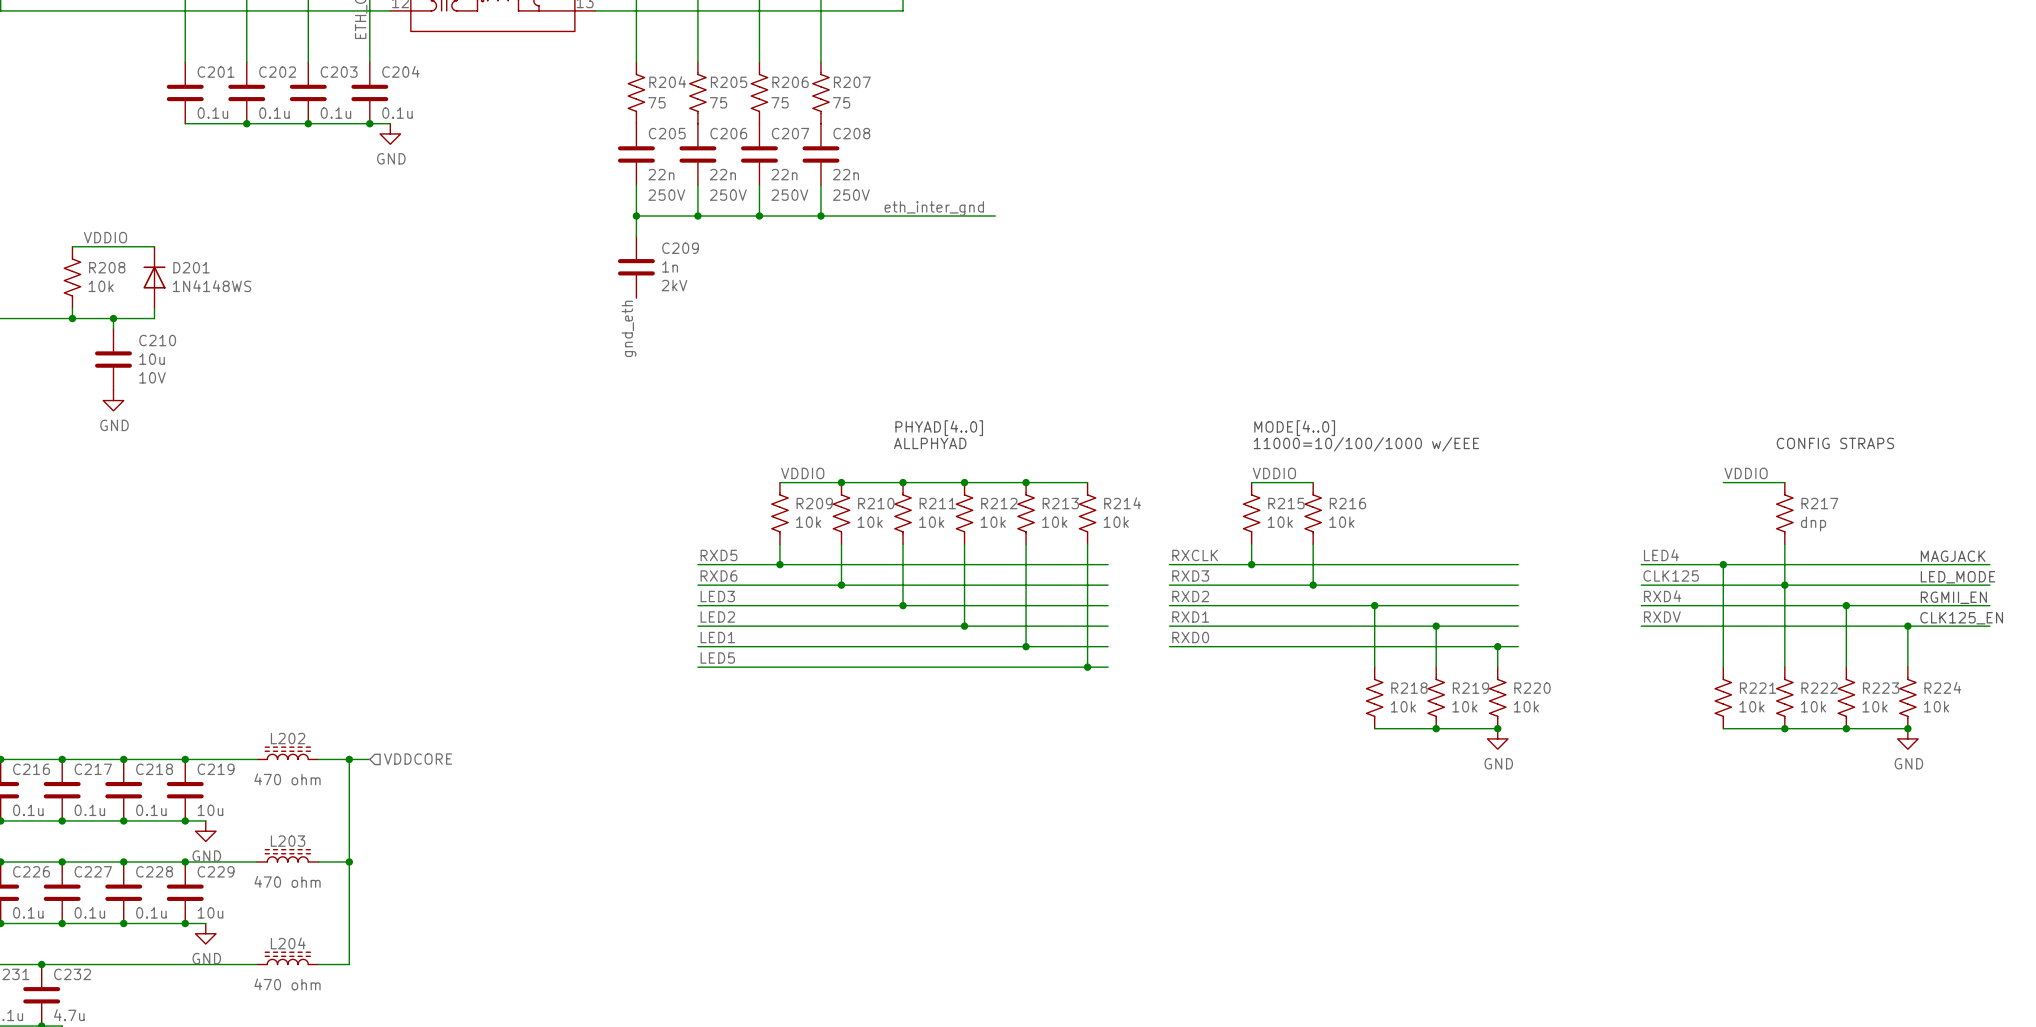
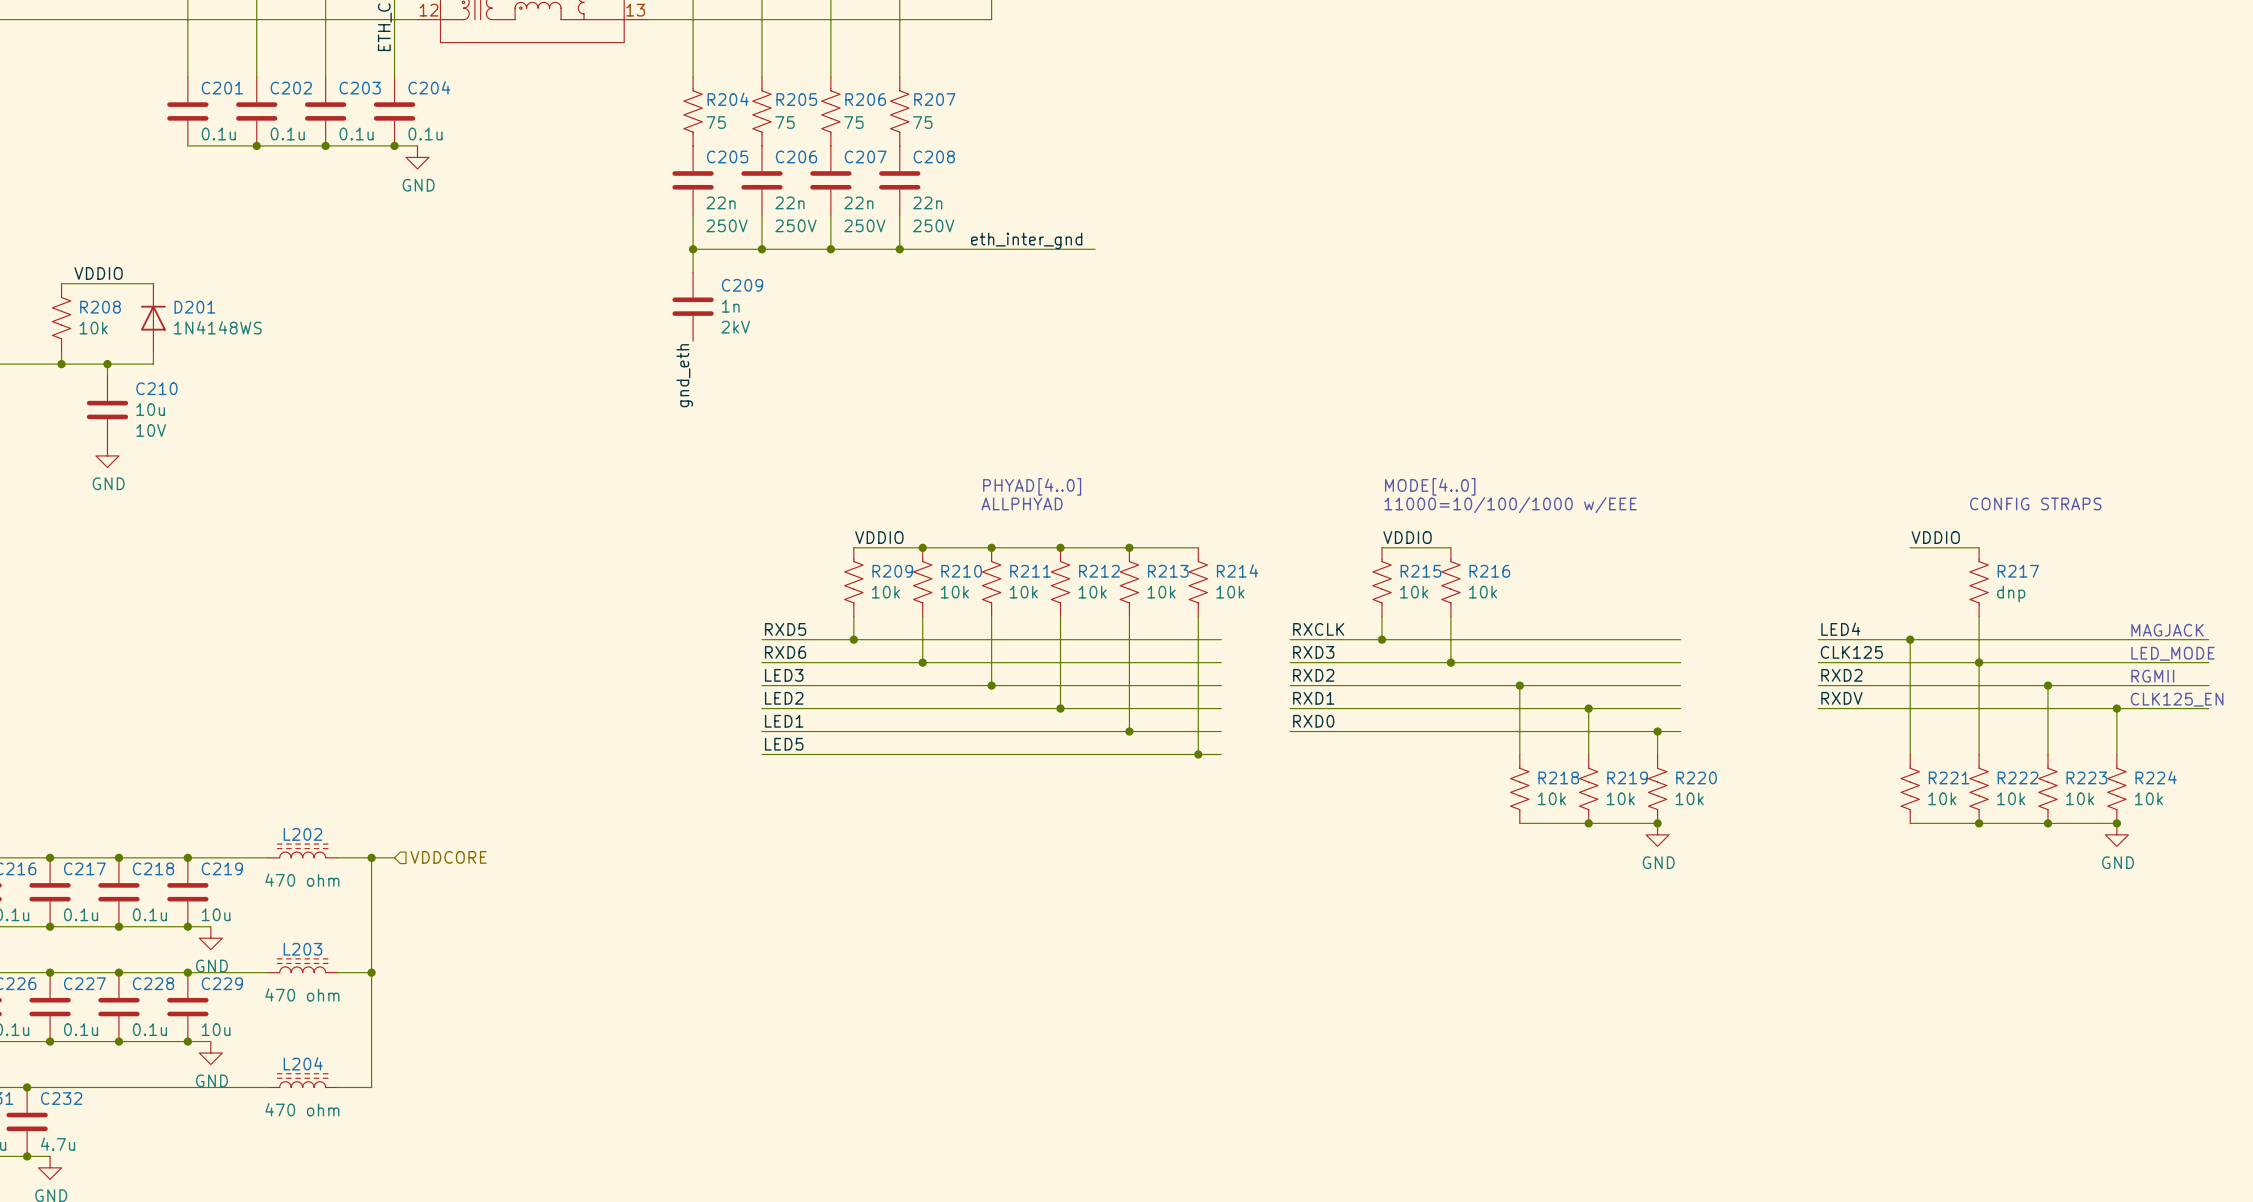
label: RXD4 (1662, 596) -> RXD2 (1841, 675)
text: RGMII_EN (1953, 597) -> RGMII (2152, 676)

